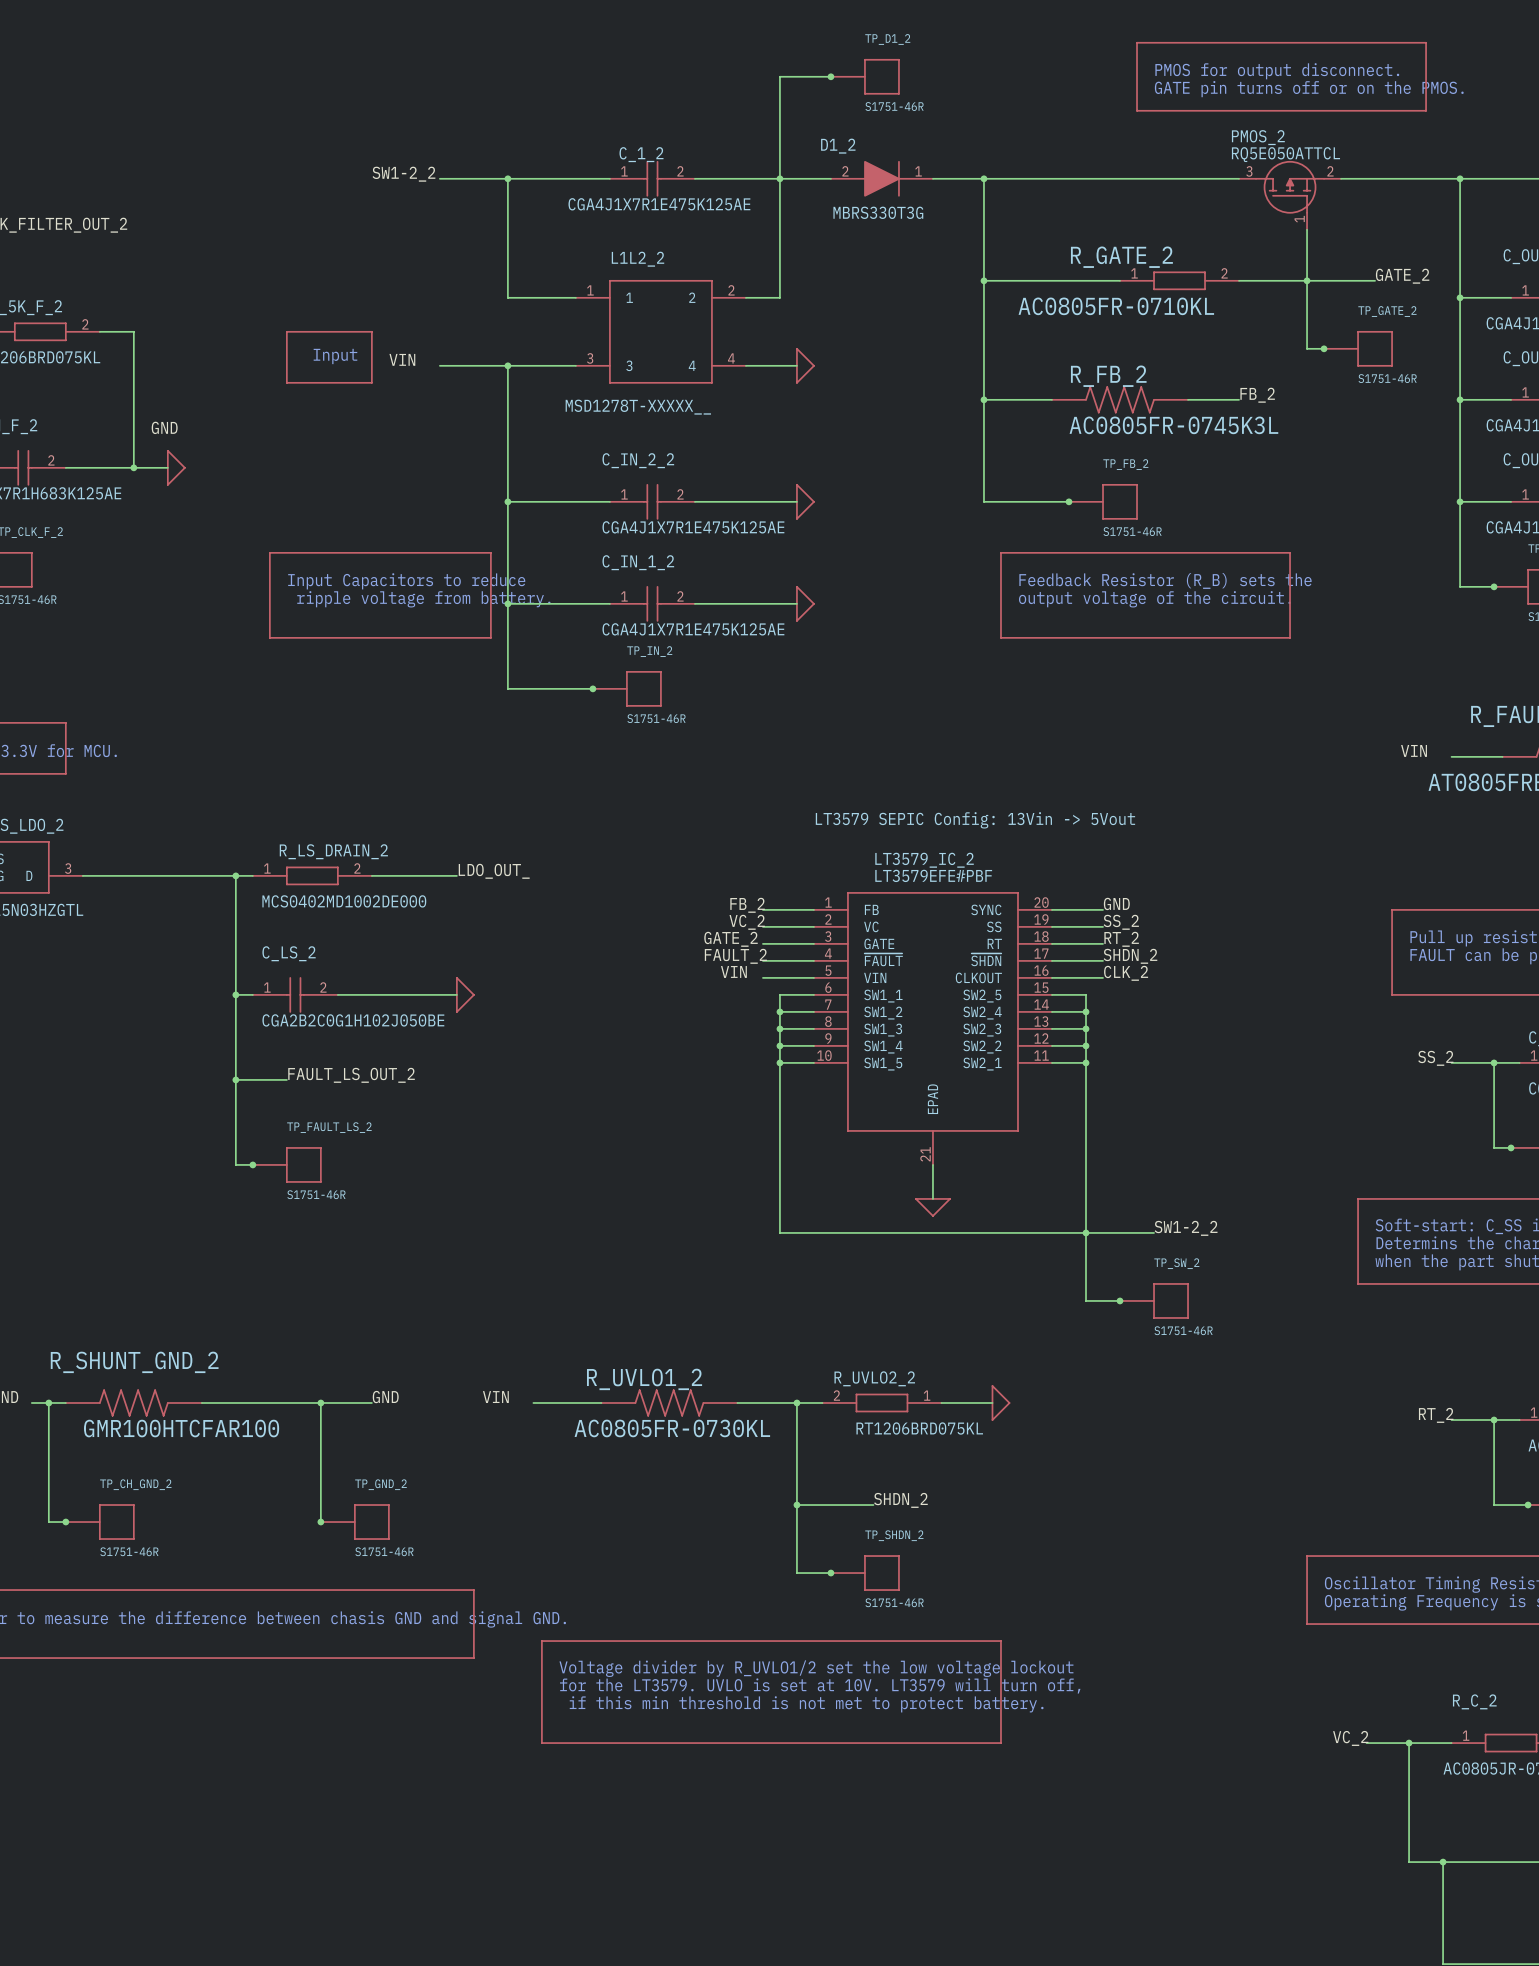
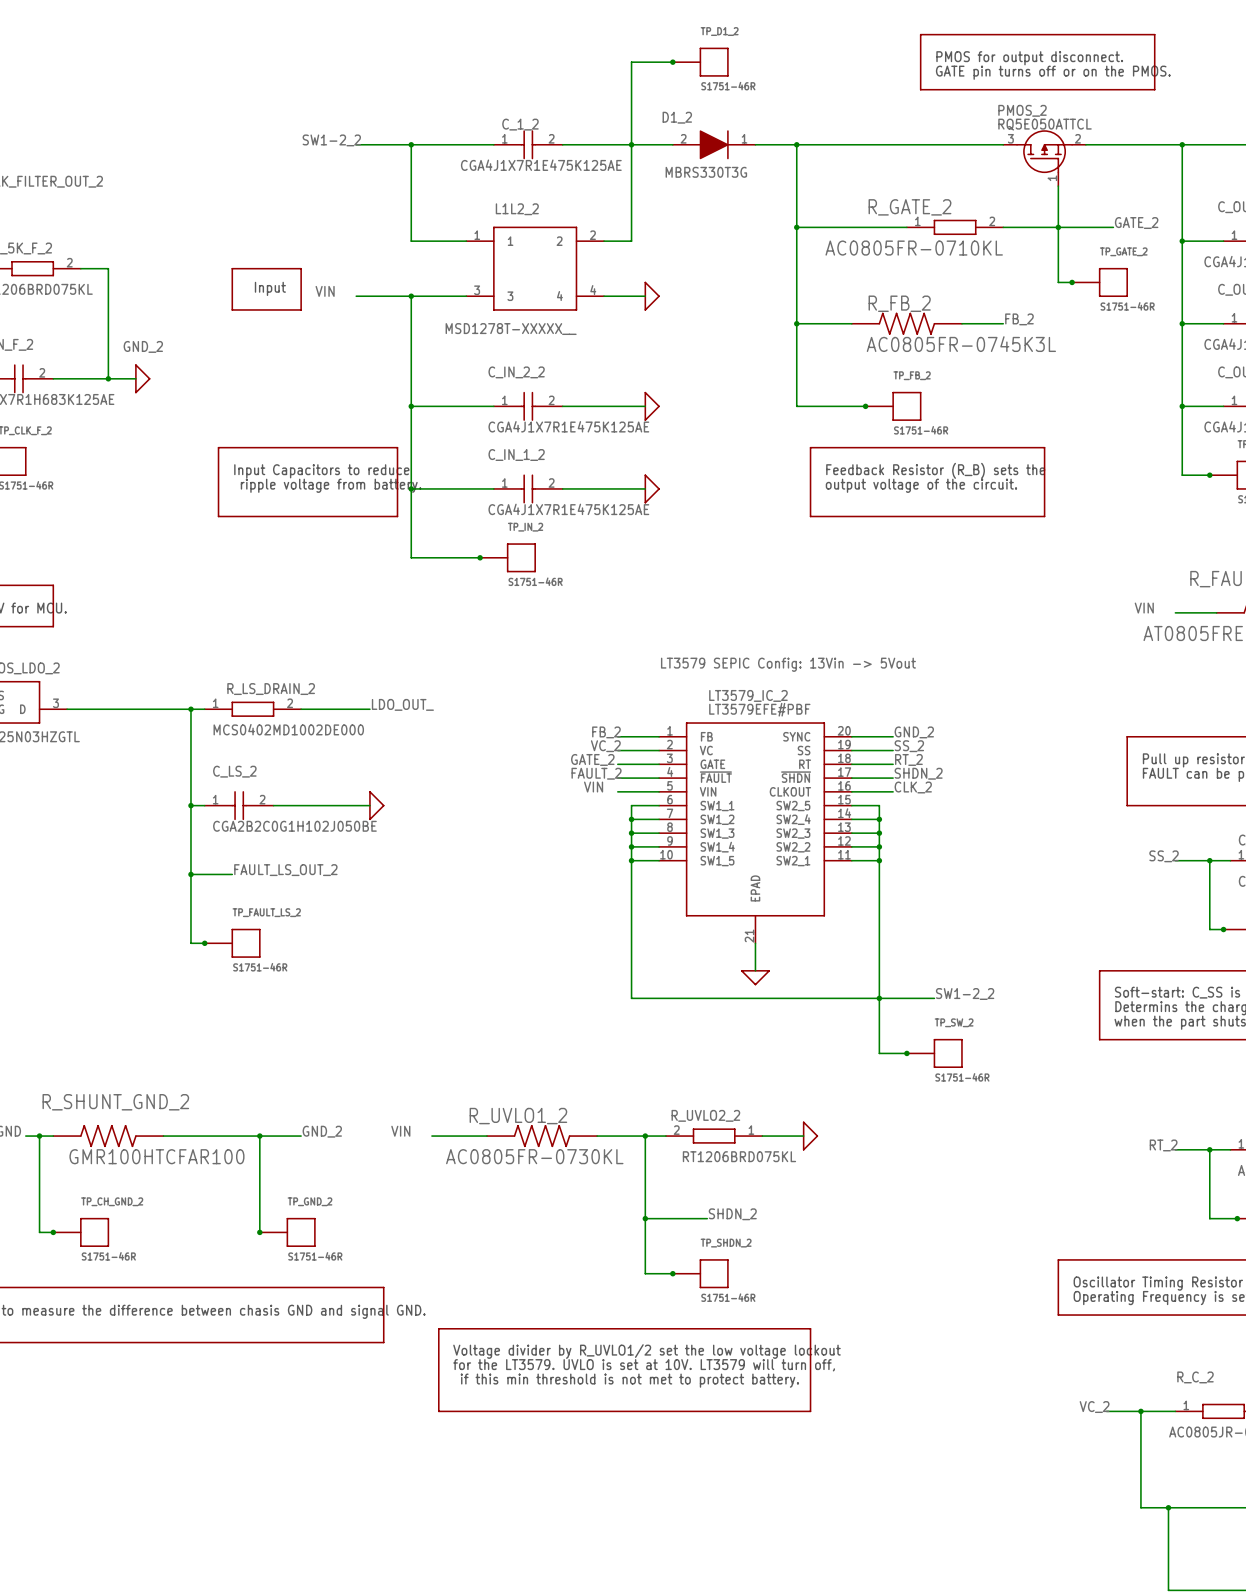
label: GND (164, 427) -> GND_2 (143, 346)
label: GND (1116, 903) -> GND_2 (914, 732)
label: GND (385, 1397) -> GND_2 (322, 1131)

